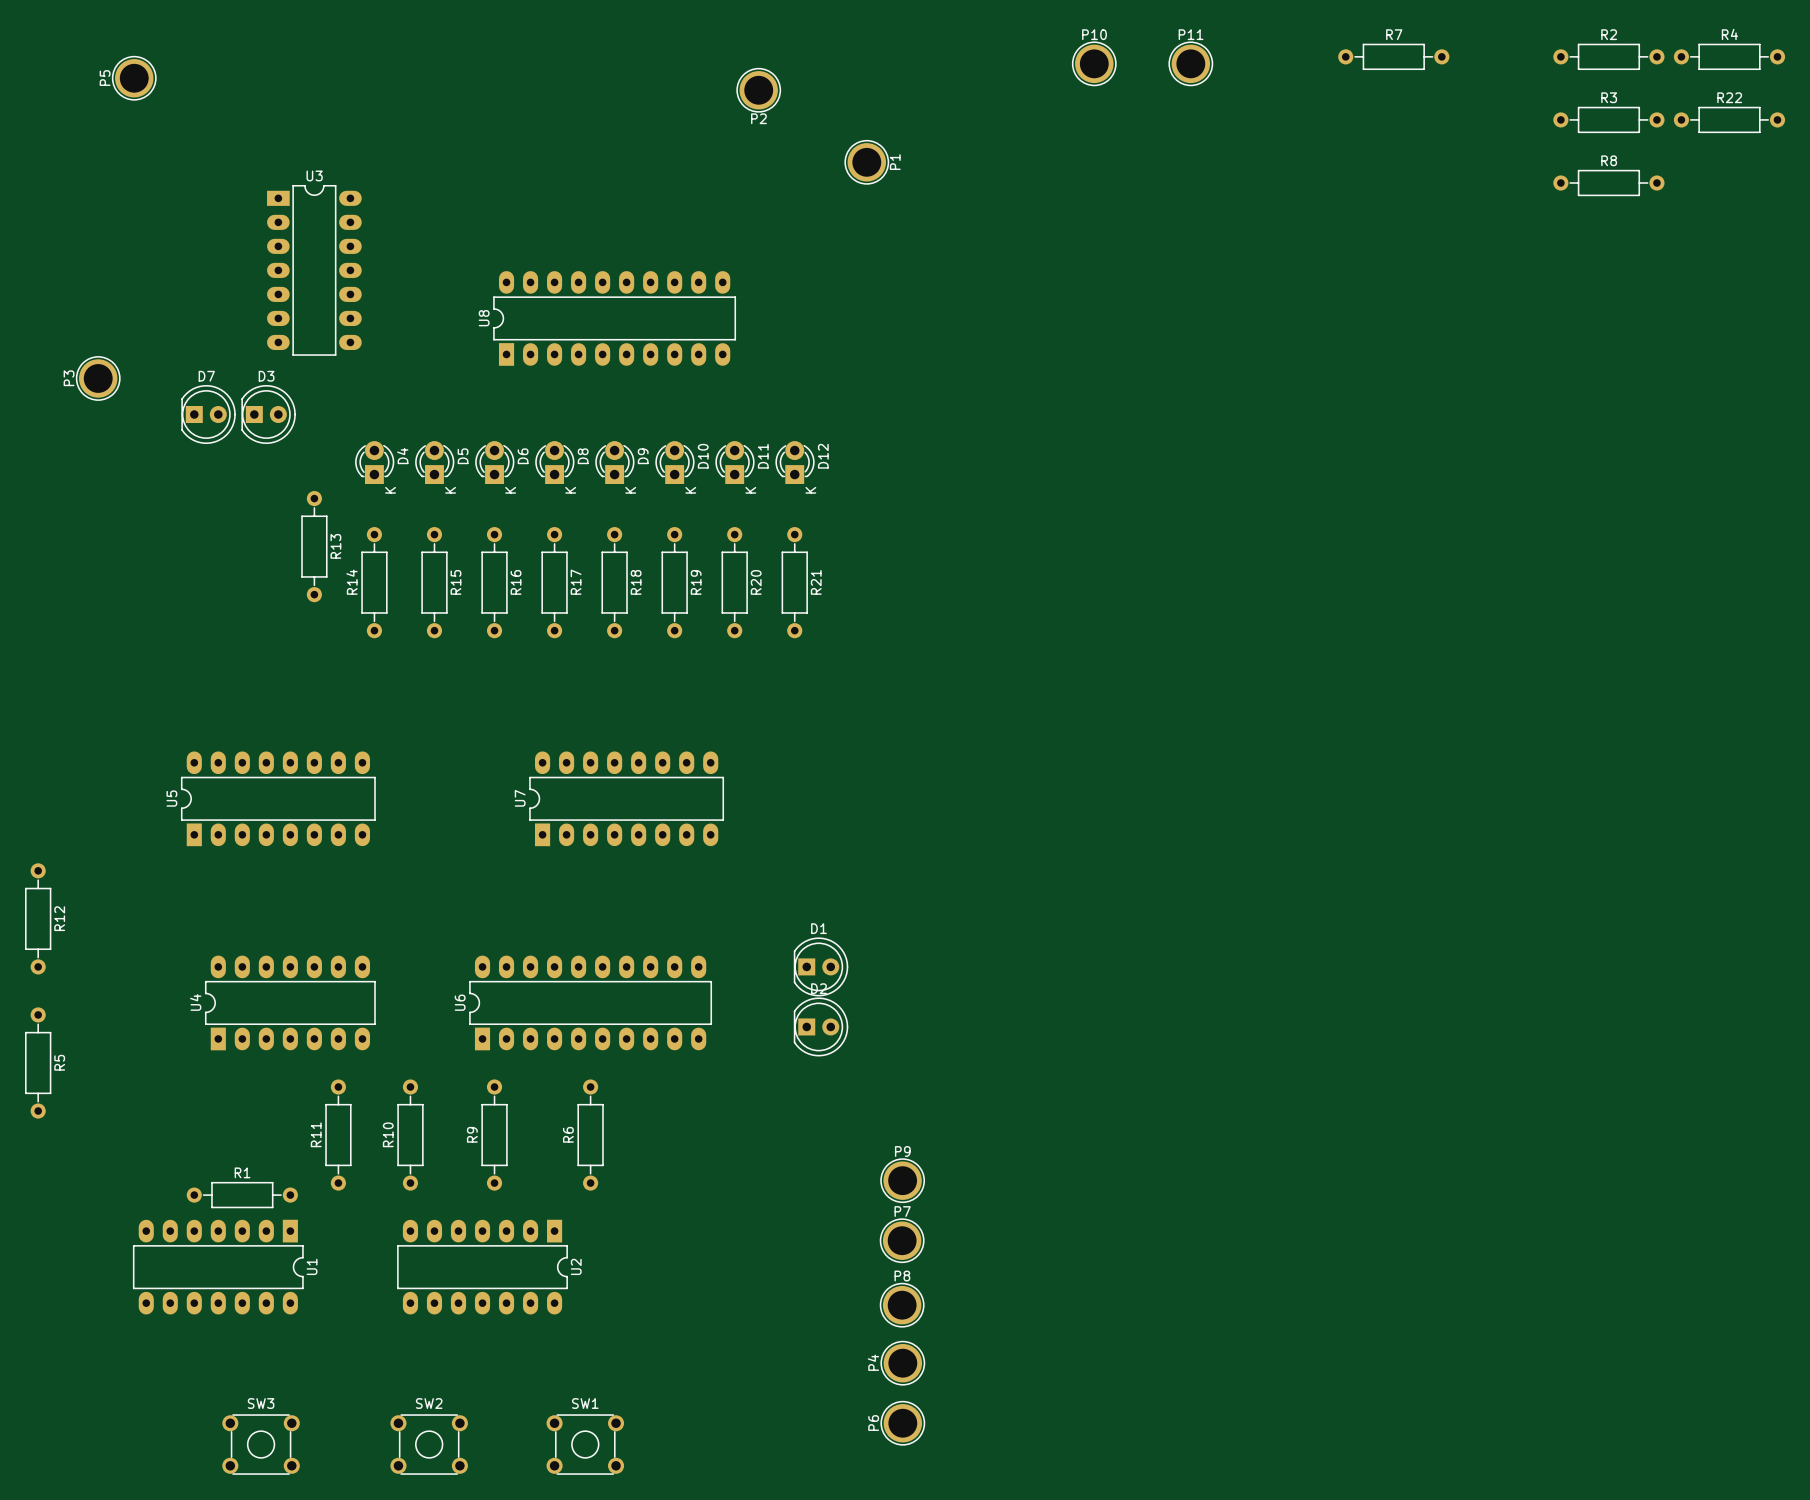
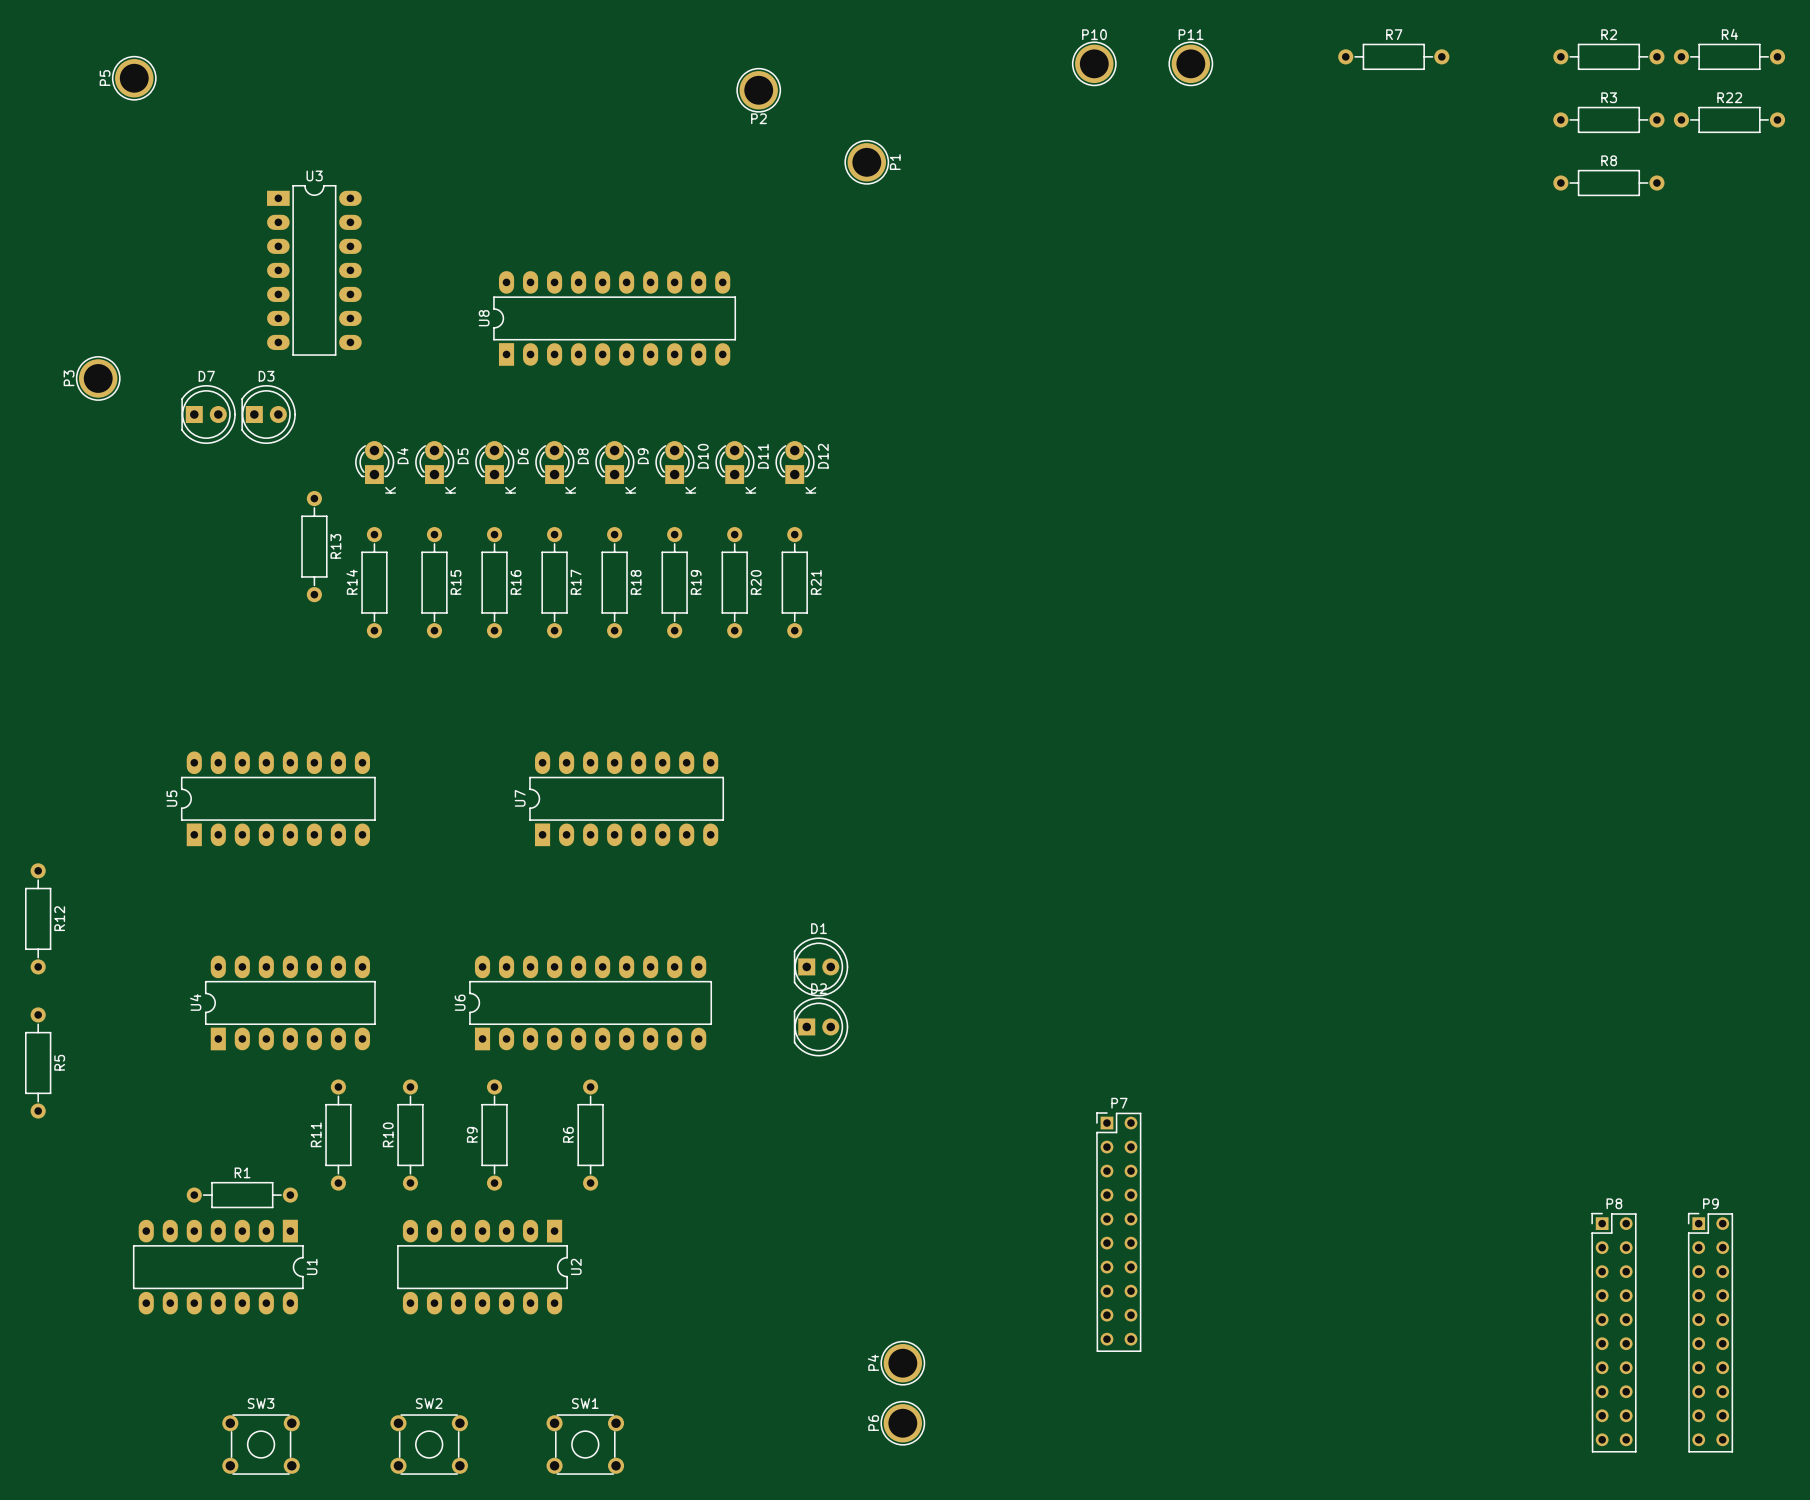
P9 name position: P9 (902, 1151) -> P9 (1710, 1203)
P9 footprint: [880, 1158, 925, 1203] -> [1688, 1213, 1733, 1453]
P7 name position: P7 (902, 1211) -> P7 (1119, 1103)
P7 footprint: [879, 1218, 925, 1263] -> [1096, 1112, 1142, 1352]
P8 name position: P8 (902, 1276) -> P8 (1614, 1203)
P8 footprint: [879, 1283, 925, 1328] -> [1591, 1213, 1637, 1453]

